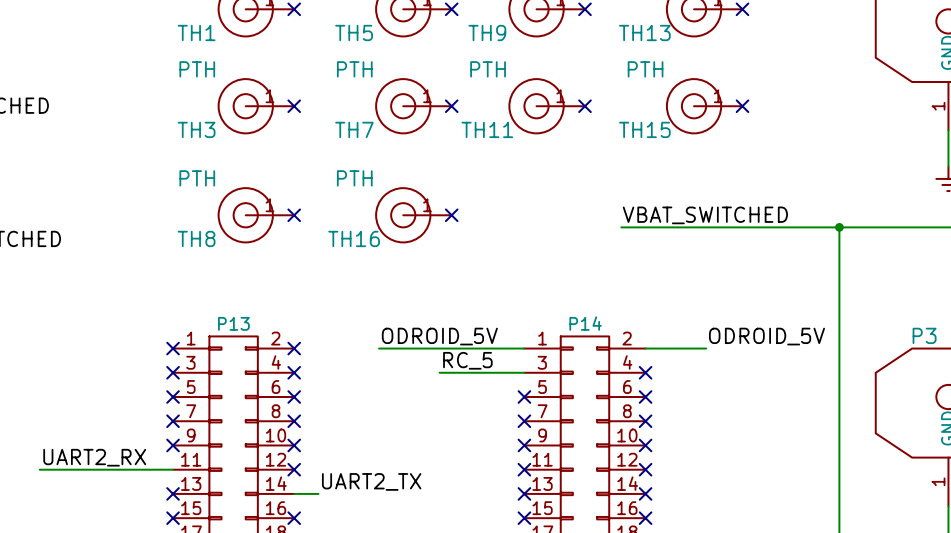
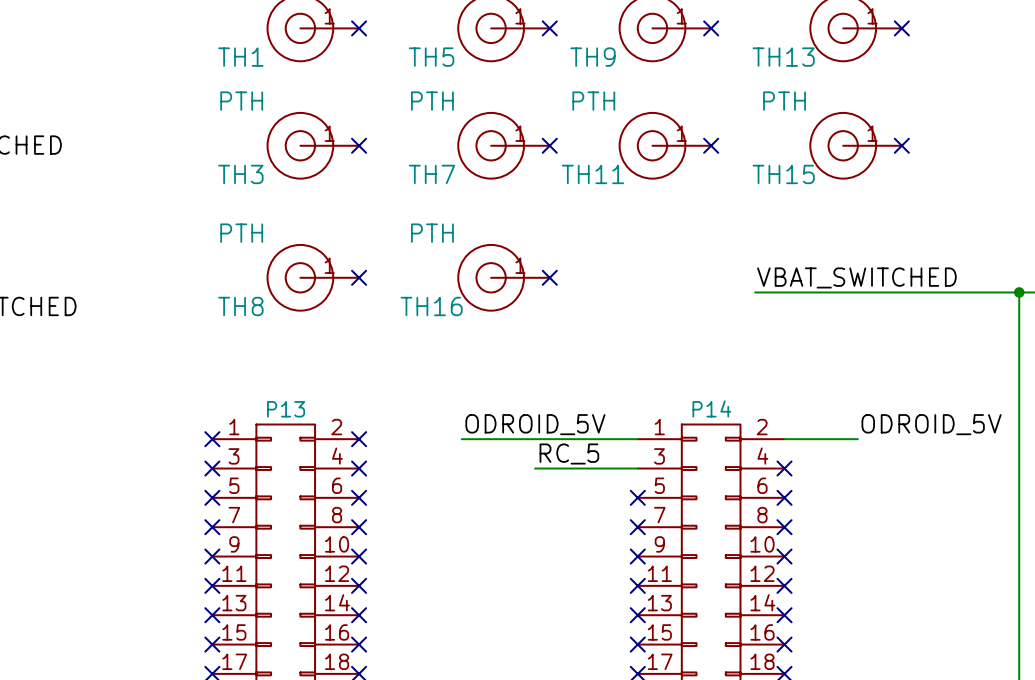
label: UART2_RX (94, 457) -> none
wire: (39, 469) (173, 469) -> none
no-connect mark: none -> (212, 585)
label: UART2_TX (371, 481) -> none
wire: (294, 493) (318, 493) -> none
no-connect mark: none -> (359, 615)

